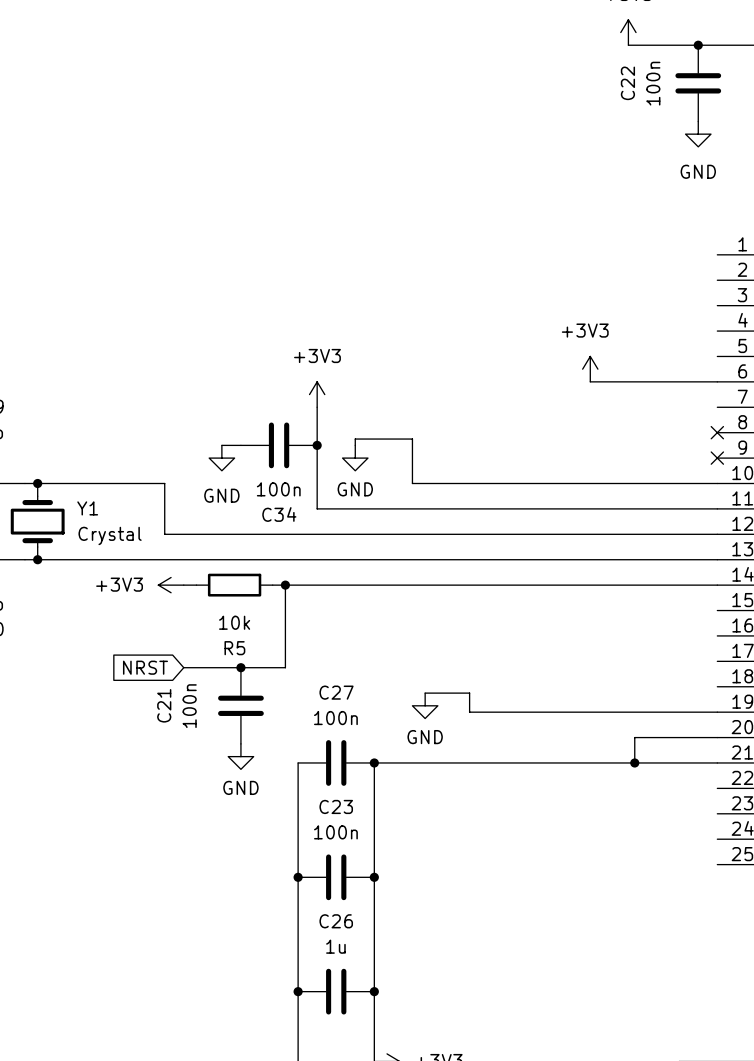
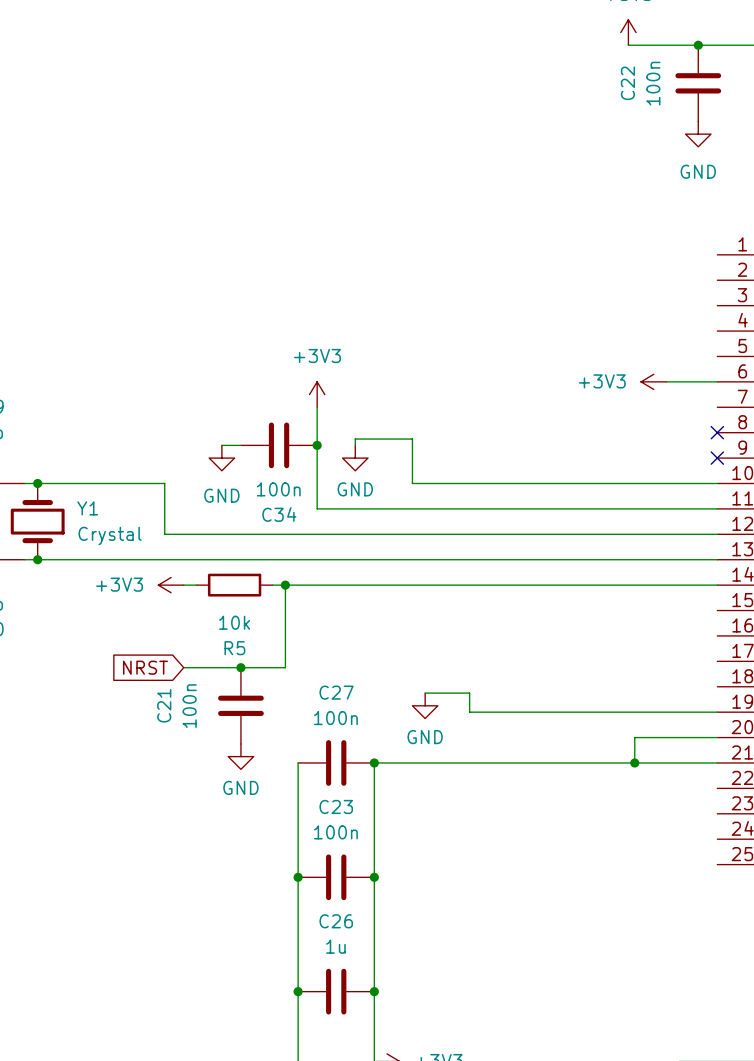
power symbol rotation: 0° (590, 369) -> 90° counterclockwise (653, 381)
power symbol position: +3V3 (590, 369) -> +3V3 (653, 381)
wire: (590, 381) (666, 381) -> none

